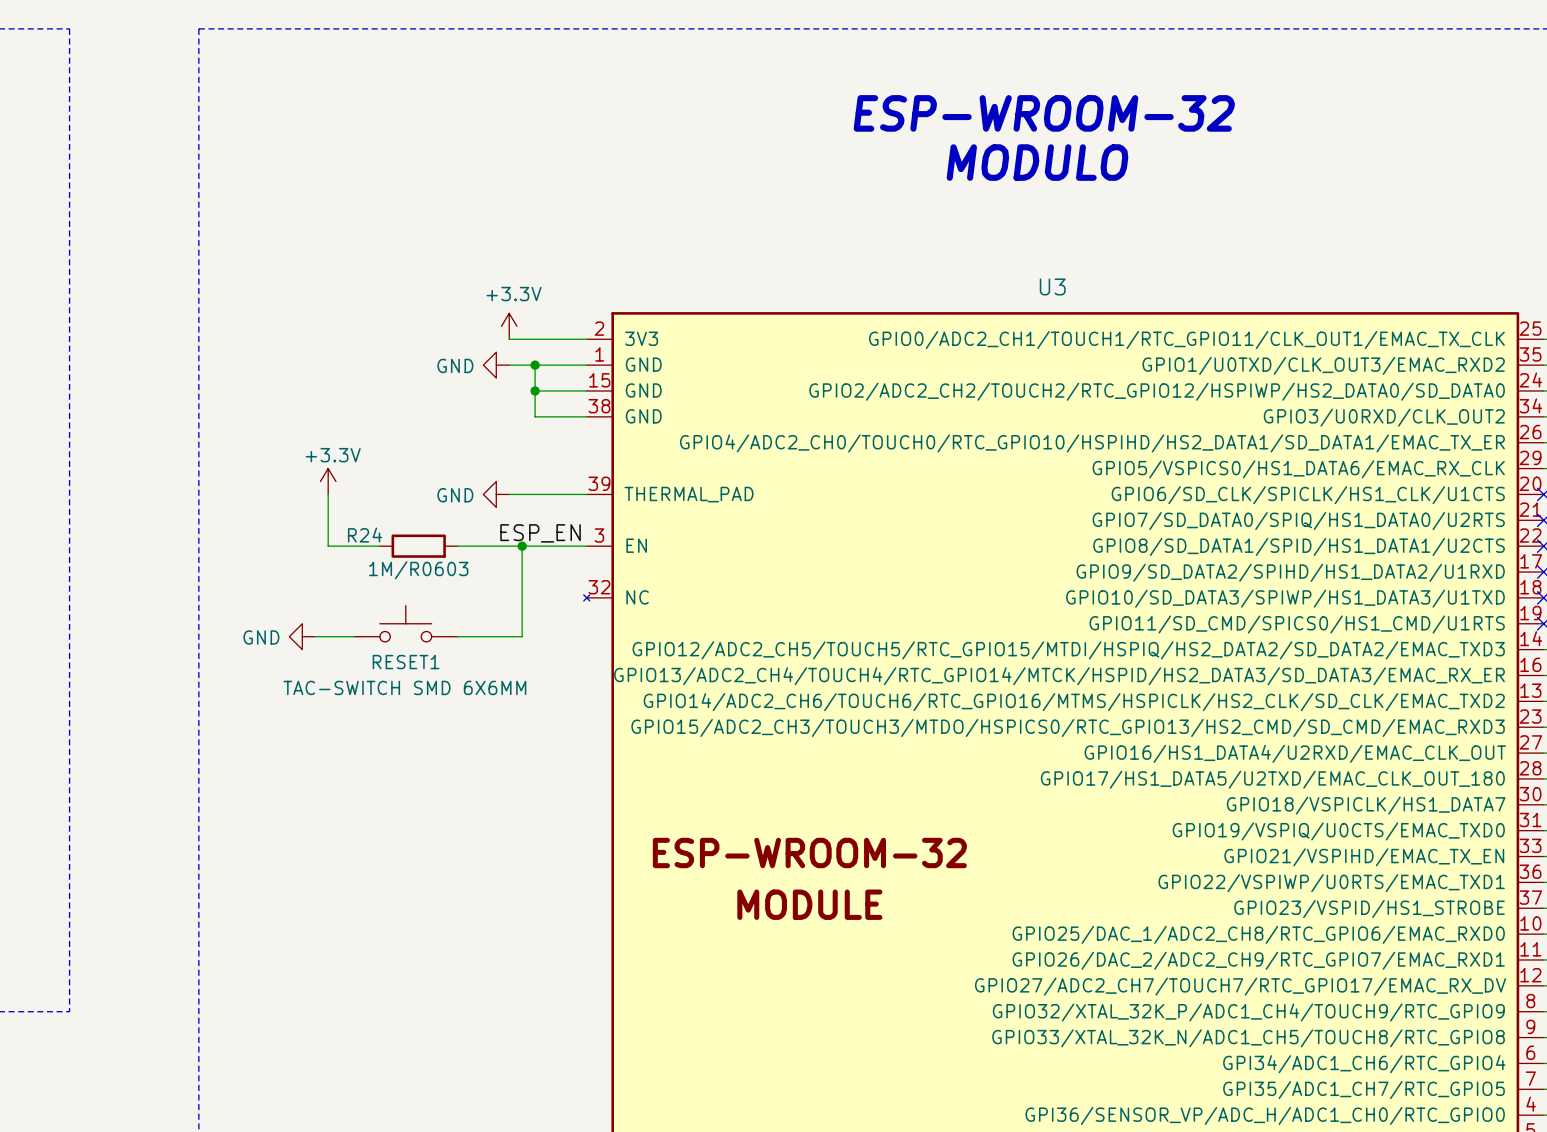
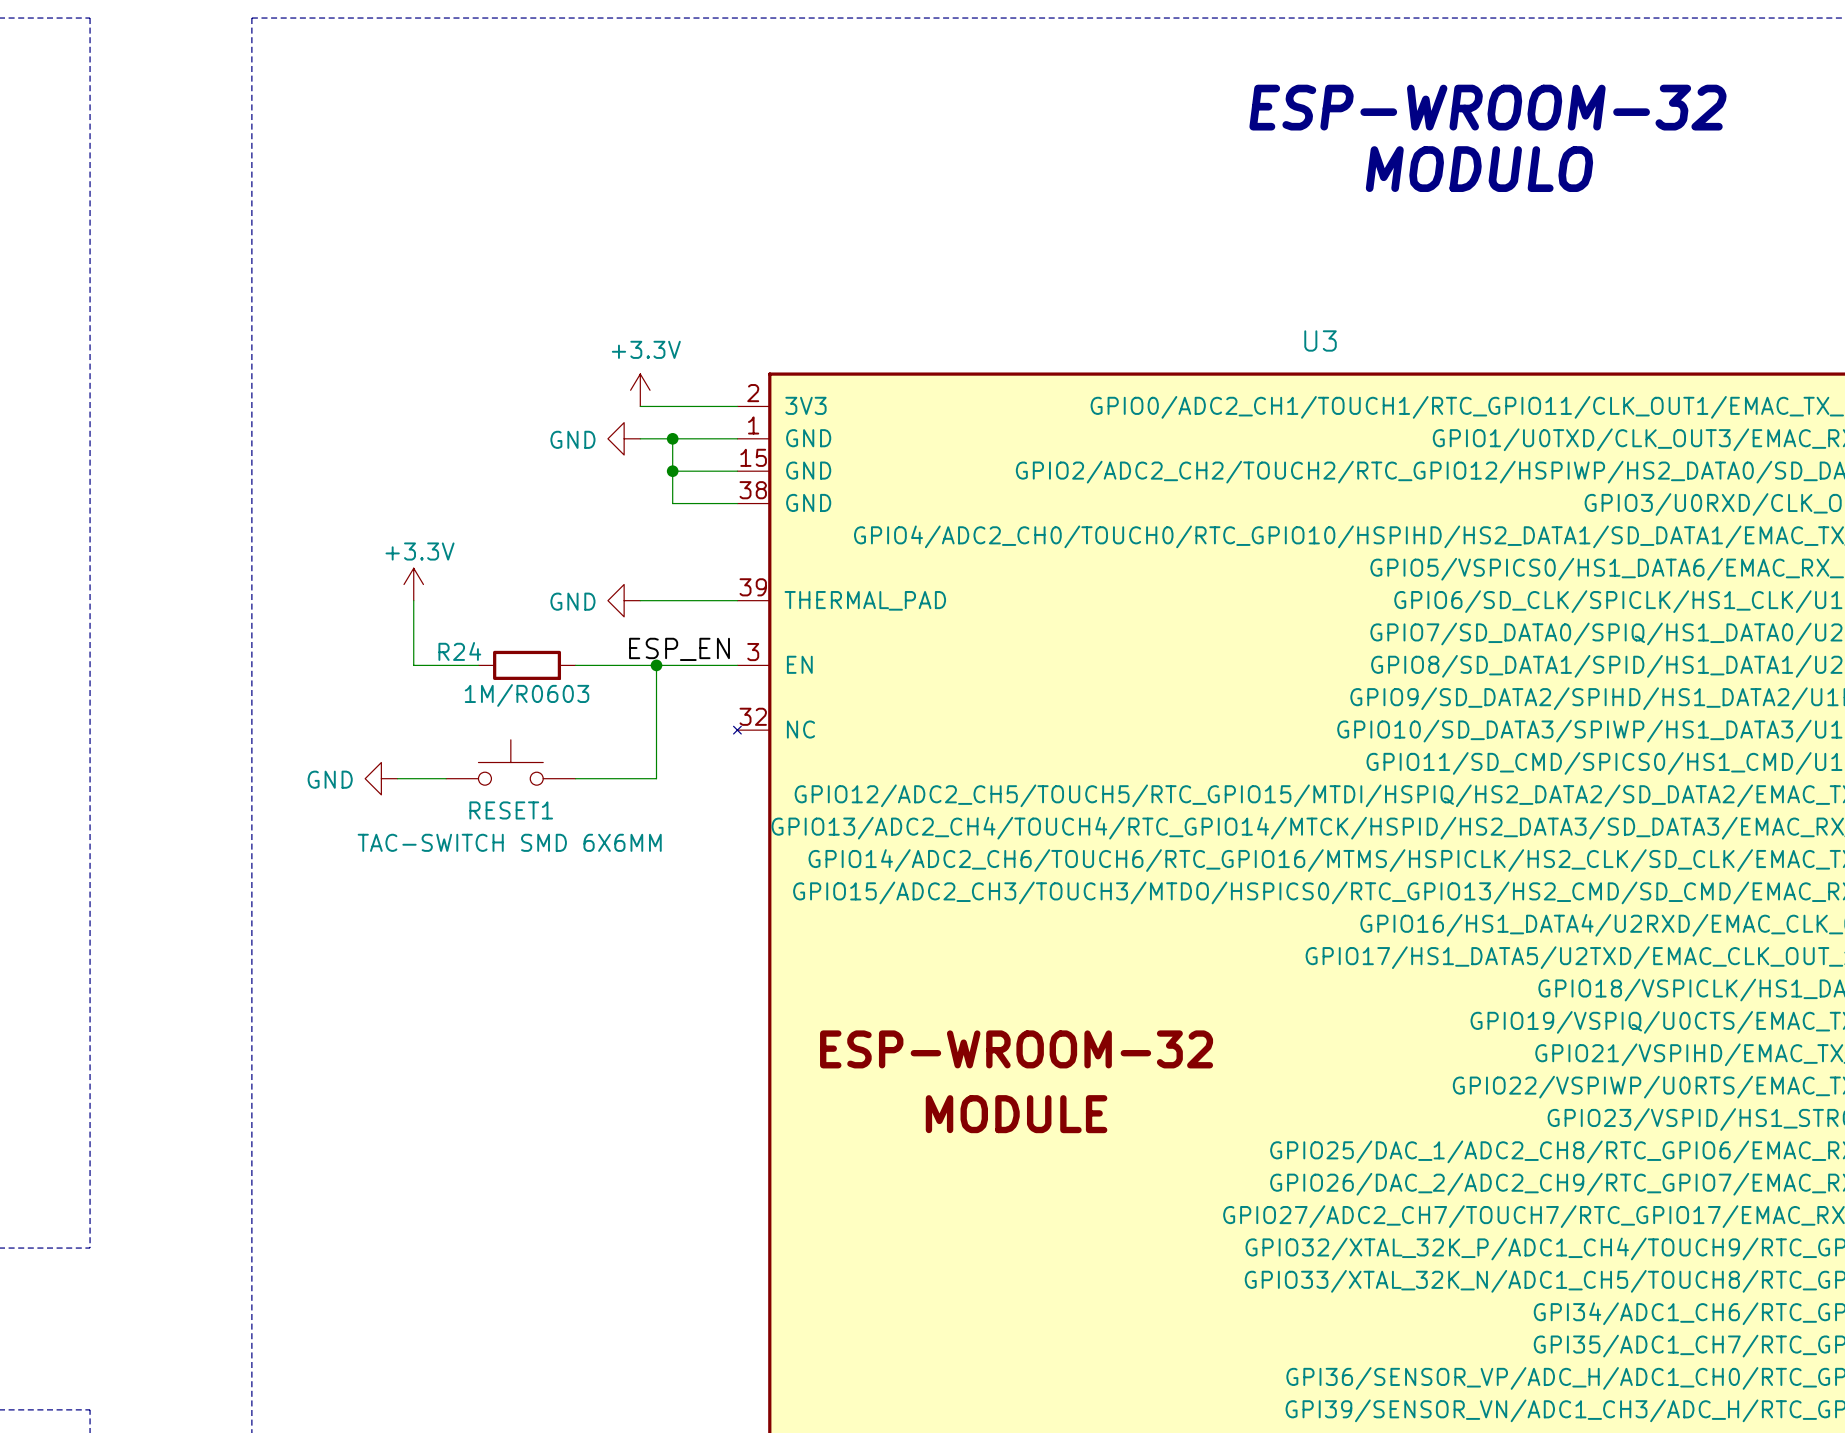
text position: ESP-WROOM-32 (1044, 113) -> ESP-WROOM-32 (1488, 107)
text position: MODULO (1037, 162) -> MODULO (1479, 169)

